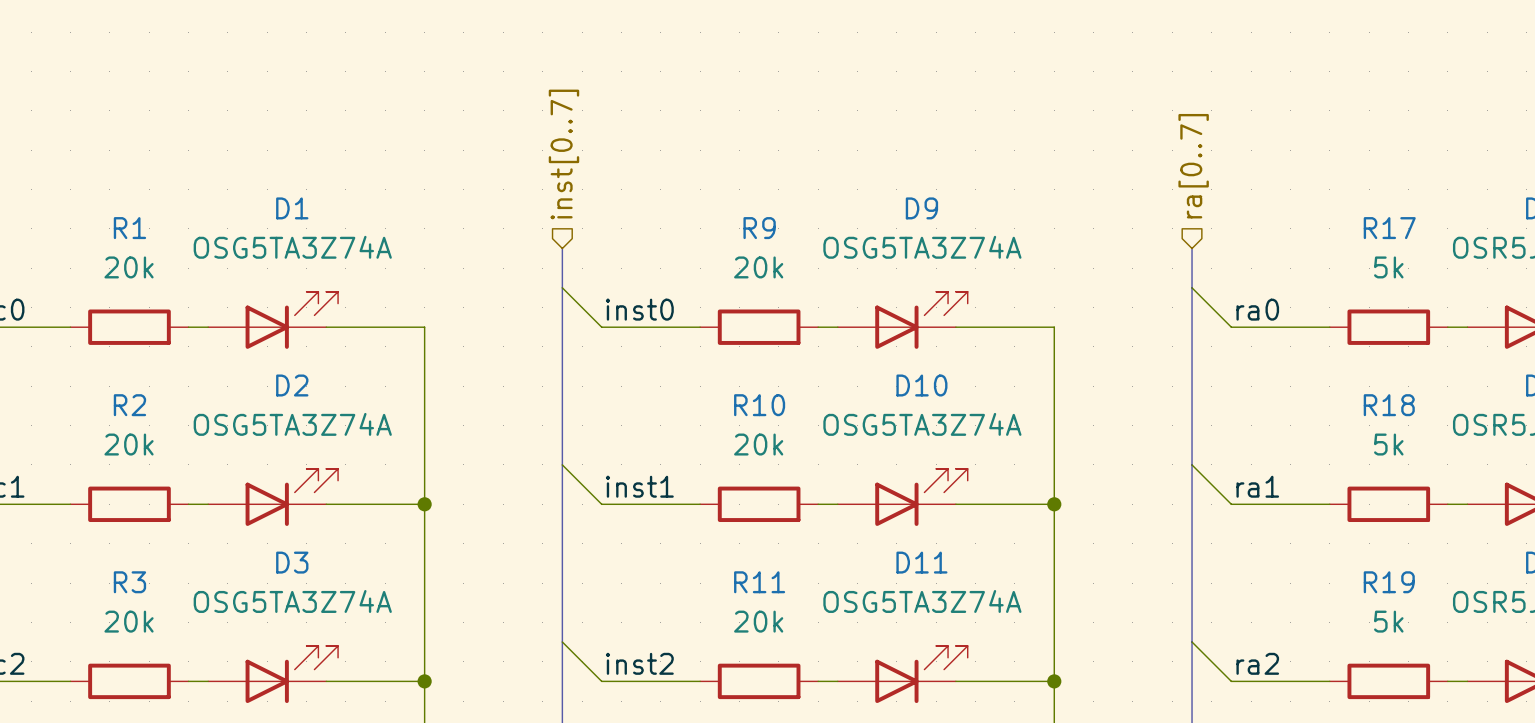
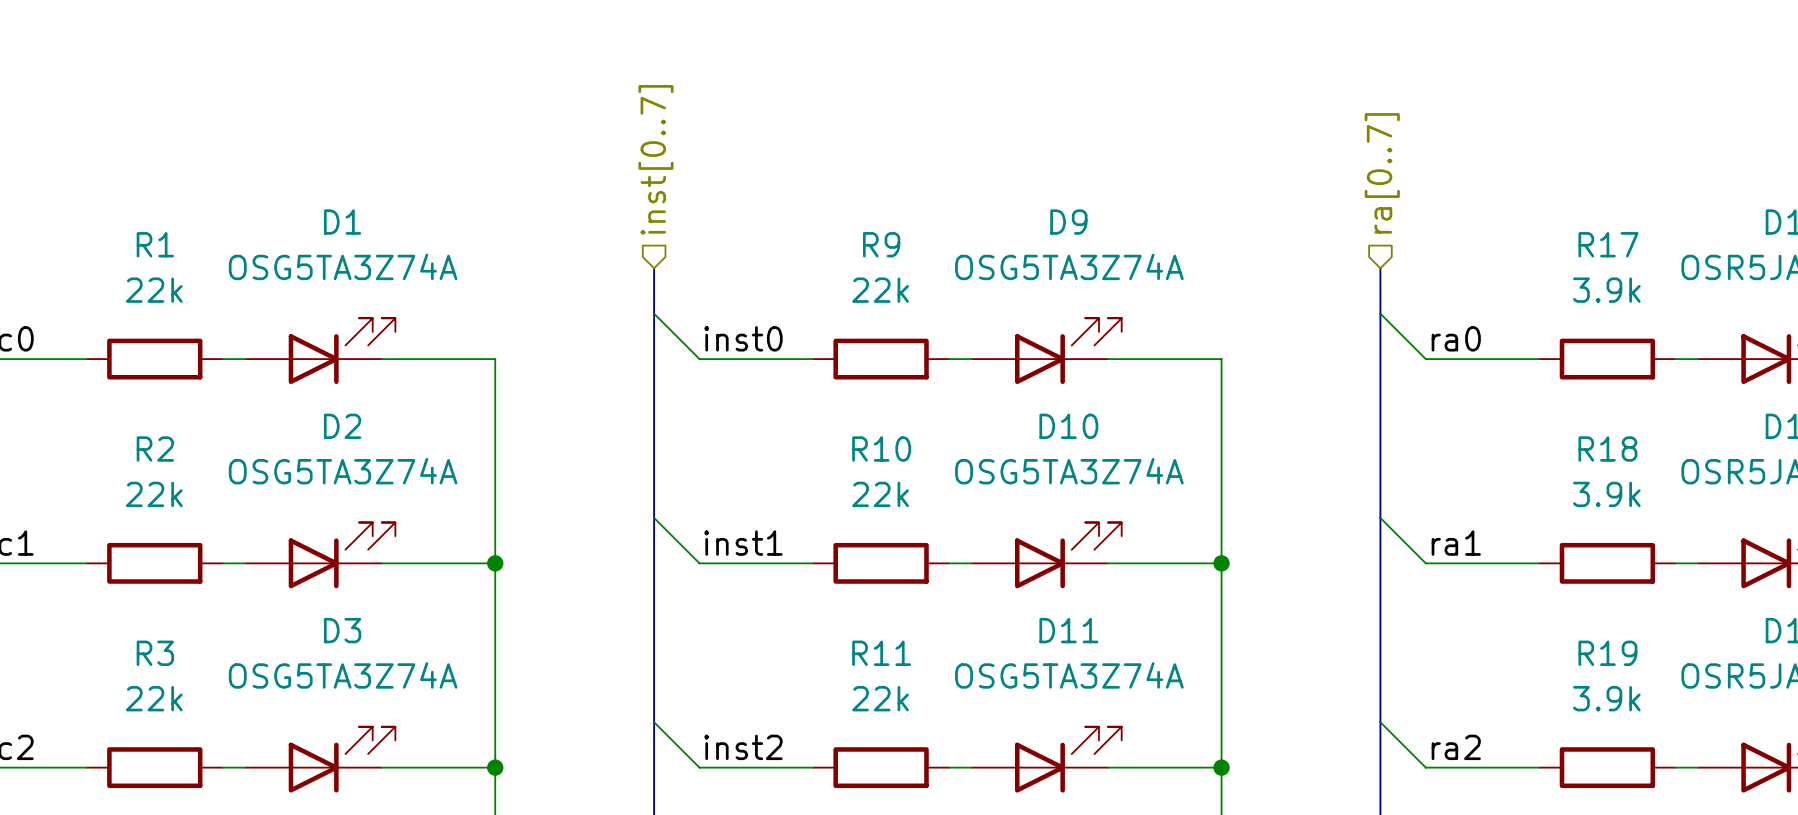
R1 value: 20k (129, 267) -> 22k (154, 290)
R9 value: 20k (758, 267) -> 22k (880, 290)
R17 value: 5k (1388, 267) -> 3.9k (1606, 290)
R2 value: 20k (129, 444) -> 22k (154, 494)
R10 value: 20k (758, 444) -> 22k (880, 494)
R18 value: 5k (1388, 444) -> 3.9k (1606, 494)
R3 value: 20k (129, 621) -> 22k (154, 698)
R11 value: 20k (758, 621) -> 22k (880, 698)
R19 value: 5k (1388, 621) -> 3.9k (1606, 698)

